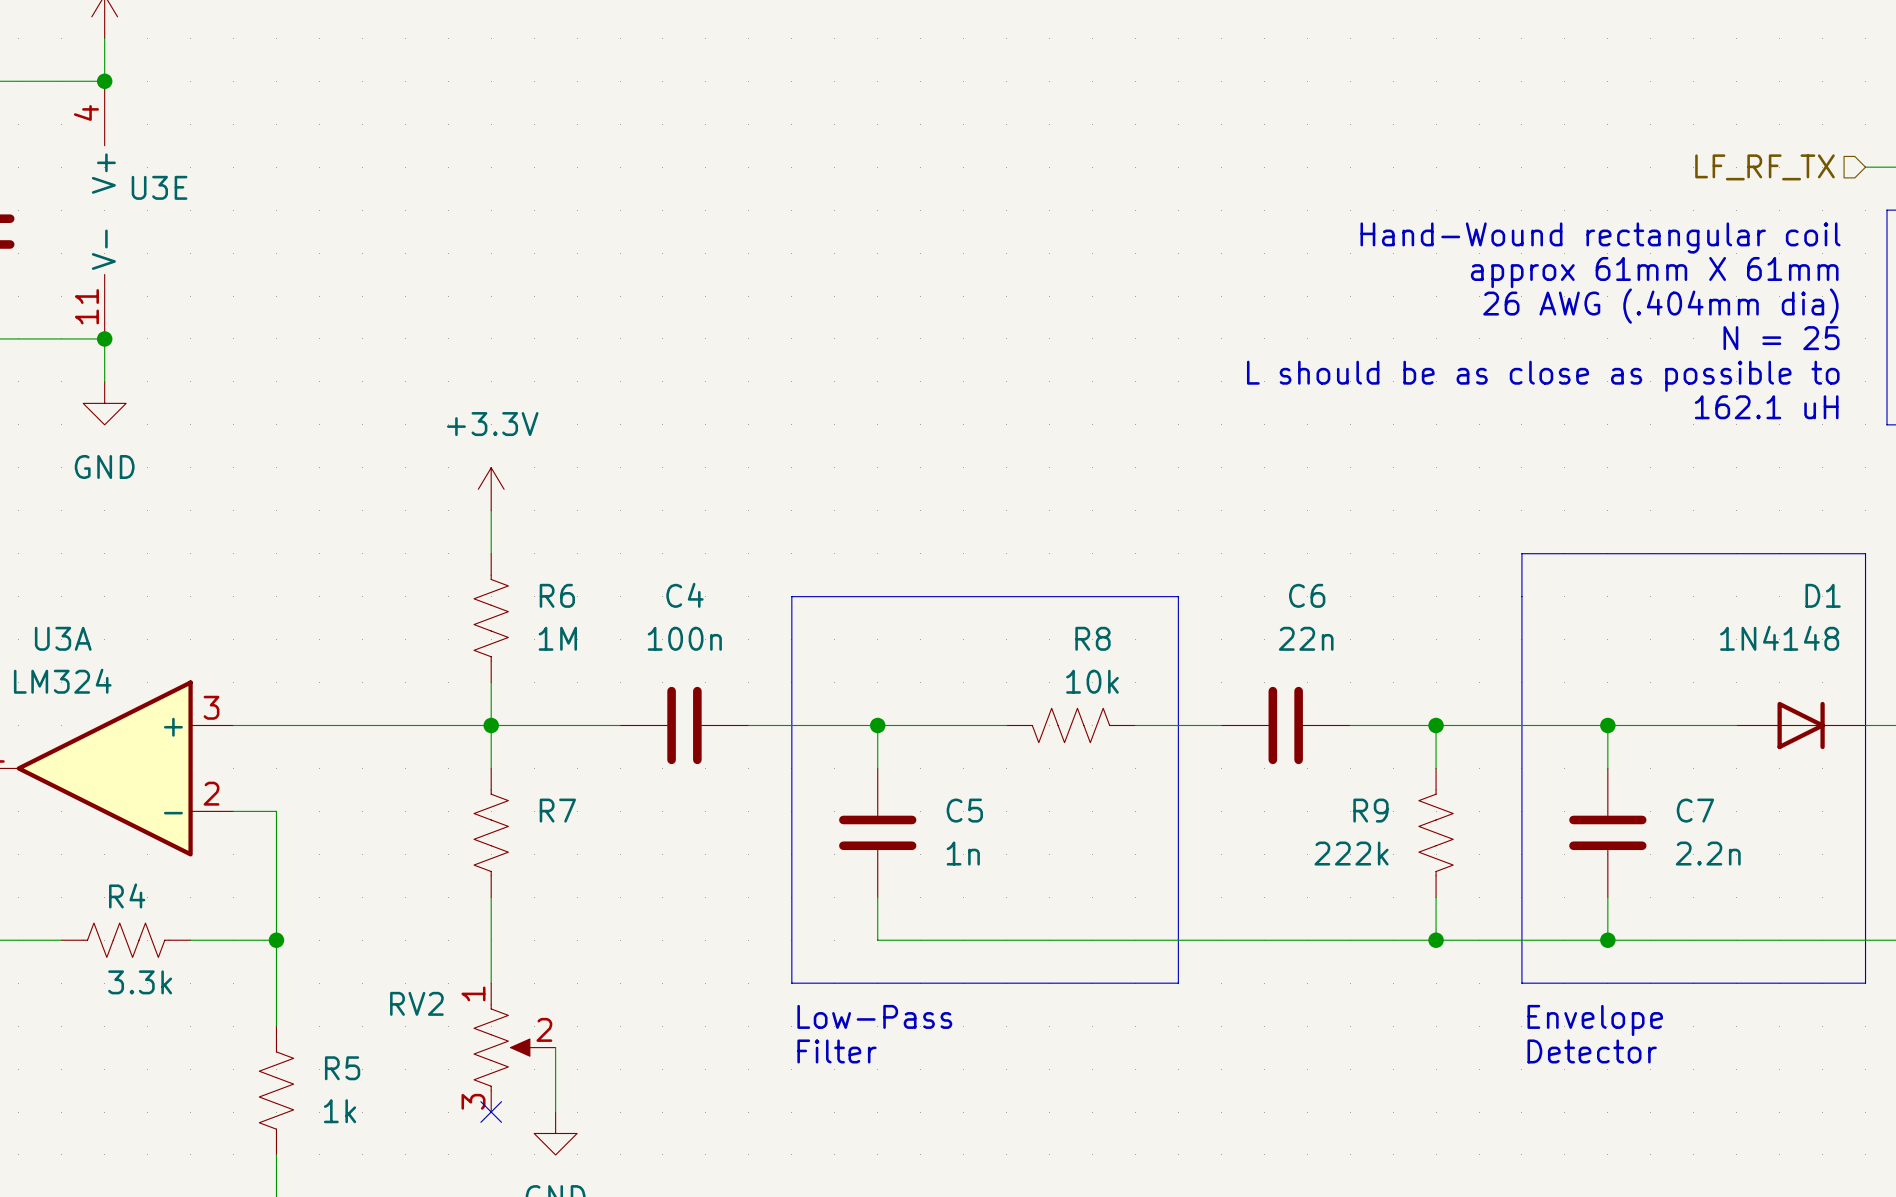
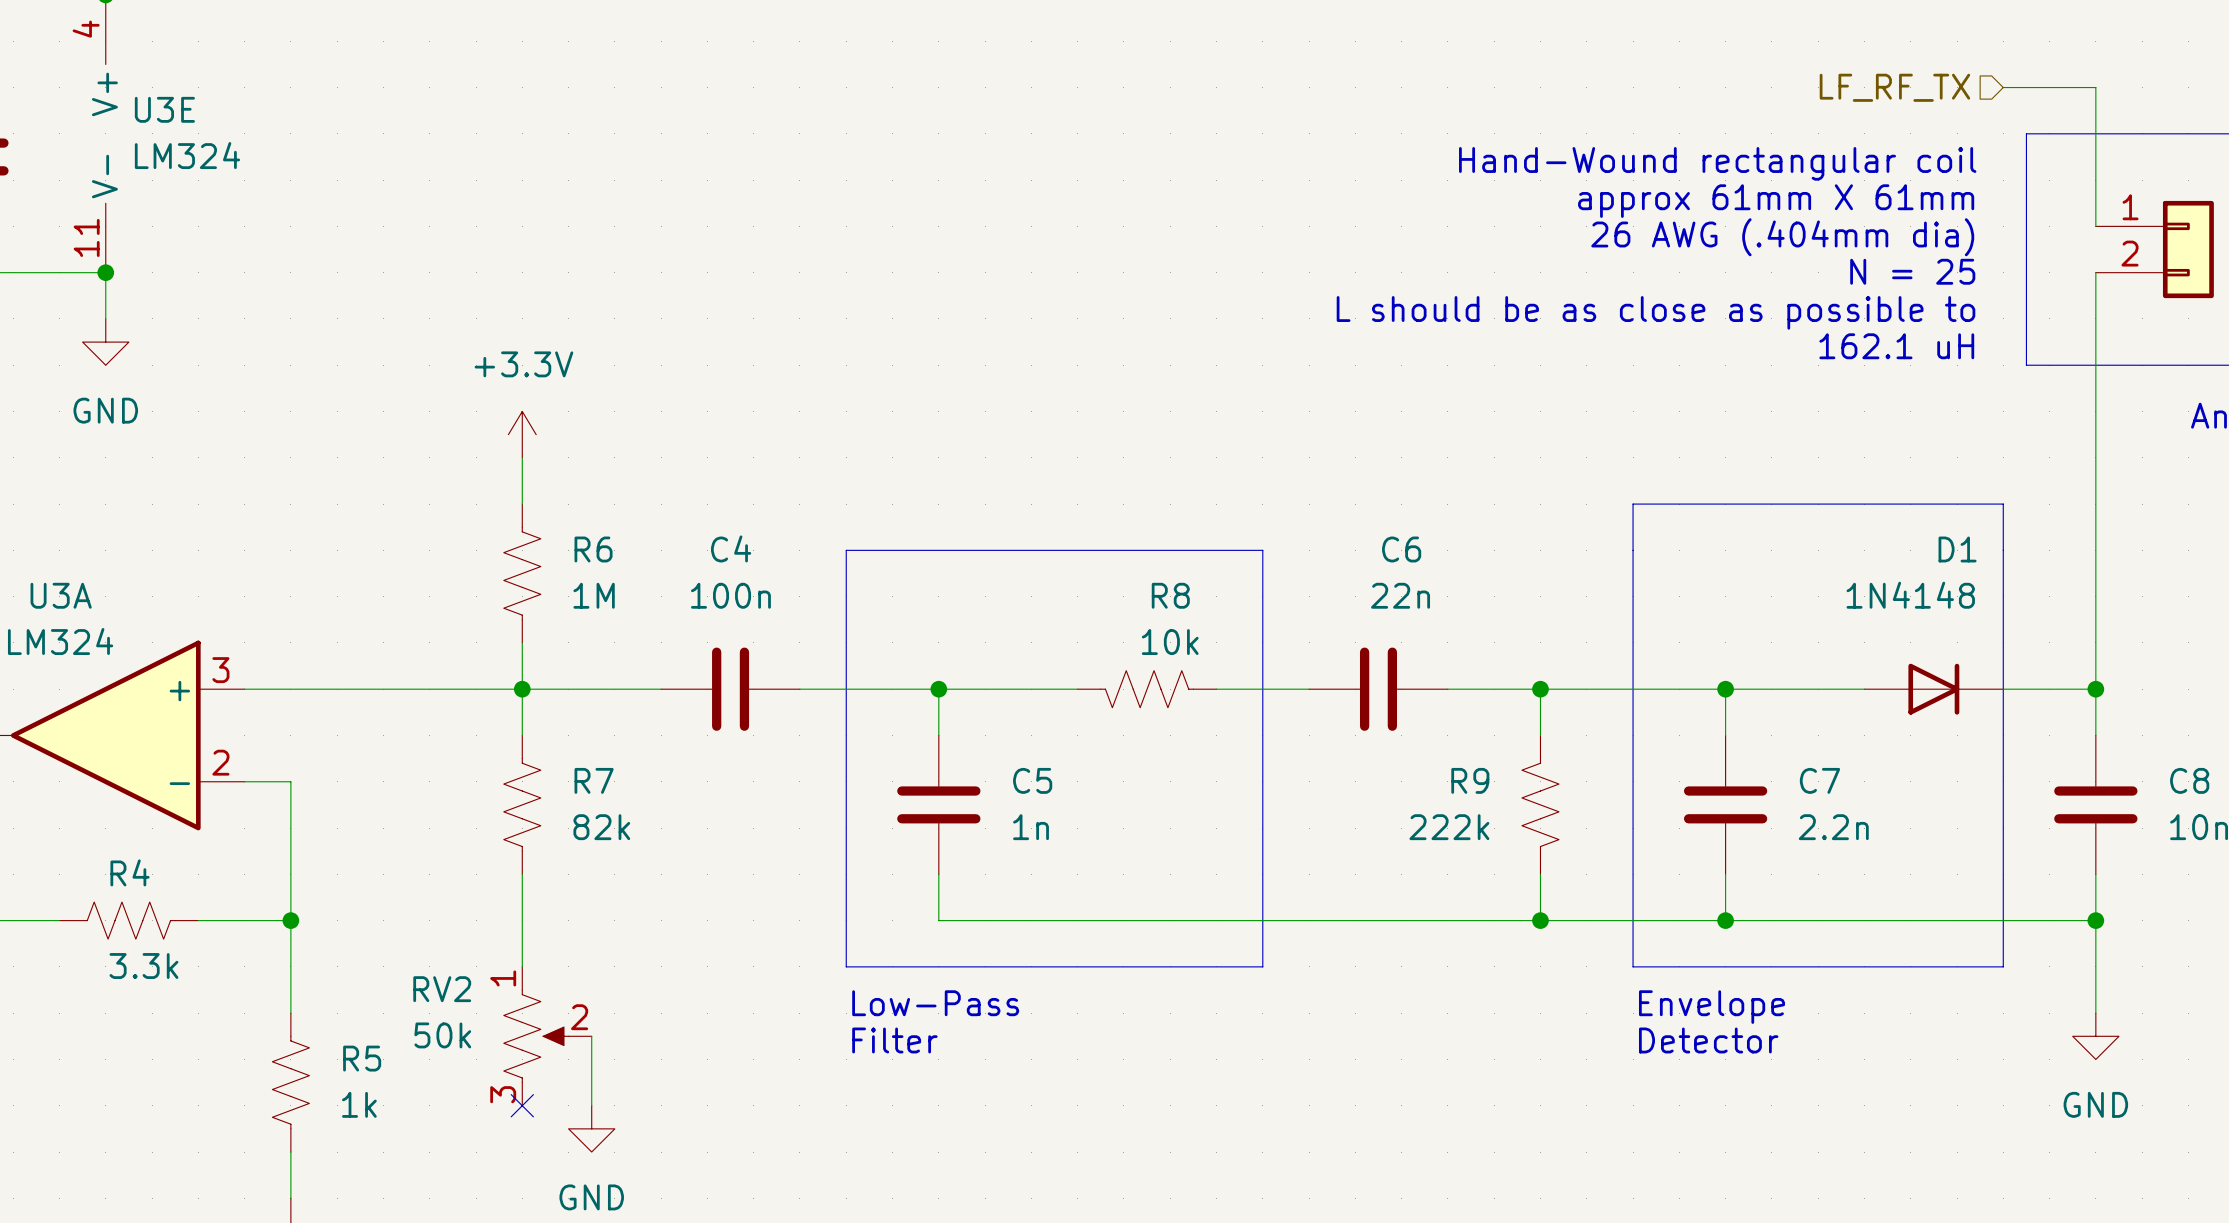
U3E value: none -> LM324 (187, 155)
R7 value: none -> 82k (601, 827)
RV2 value: none -> 50k (442, 1035)

